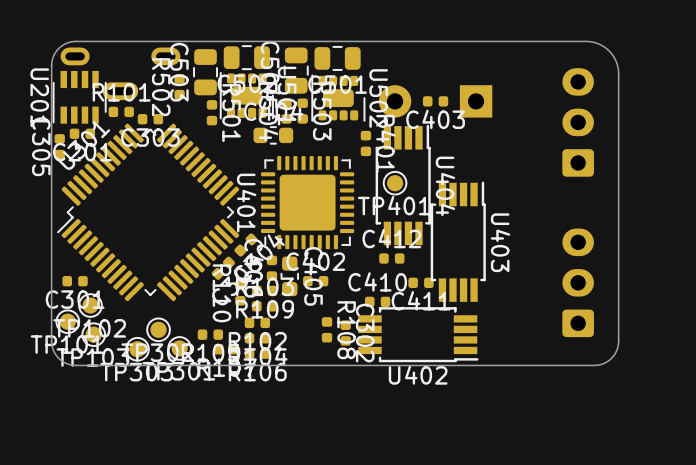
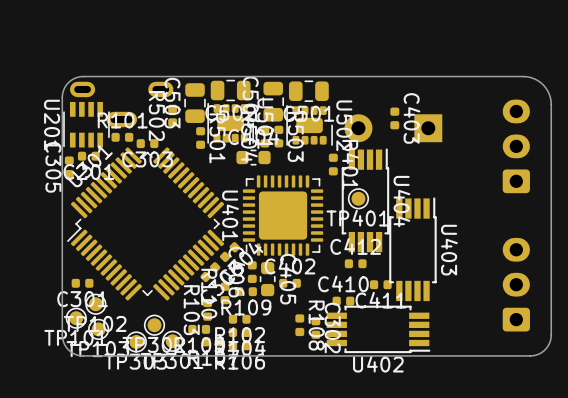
C403 rotation: 0° (435, 101) -> 90° clockwise (394, 118)
R103 rotation: 0° (264, 306) -> 90° clockwise (207, 309)
R103 position: (264, 306) -> (207, 309)

